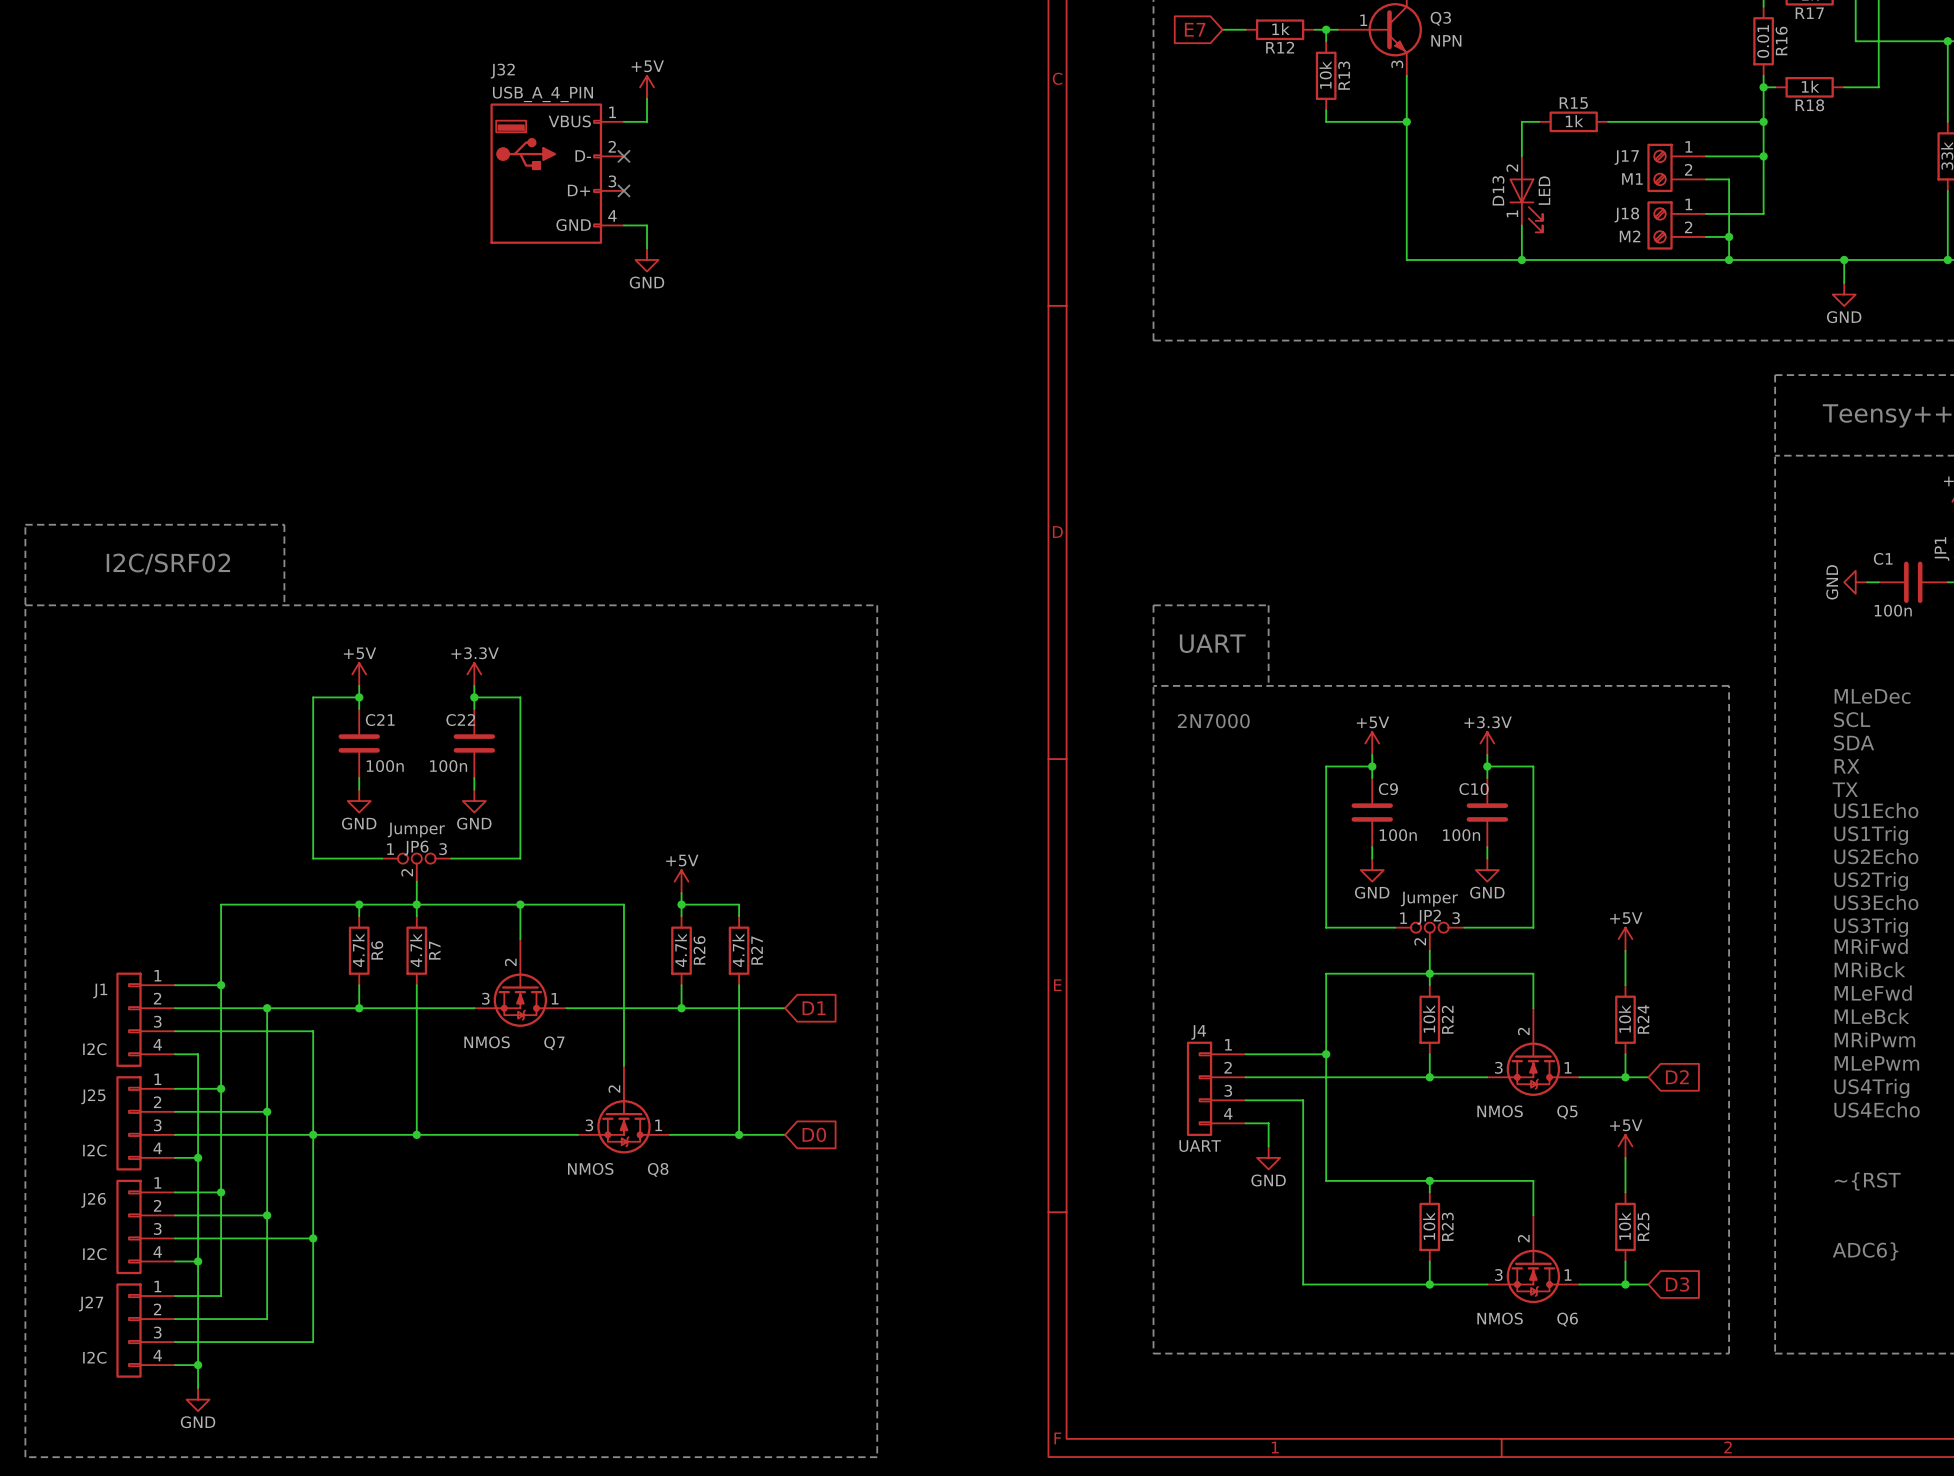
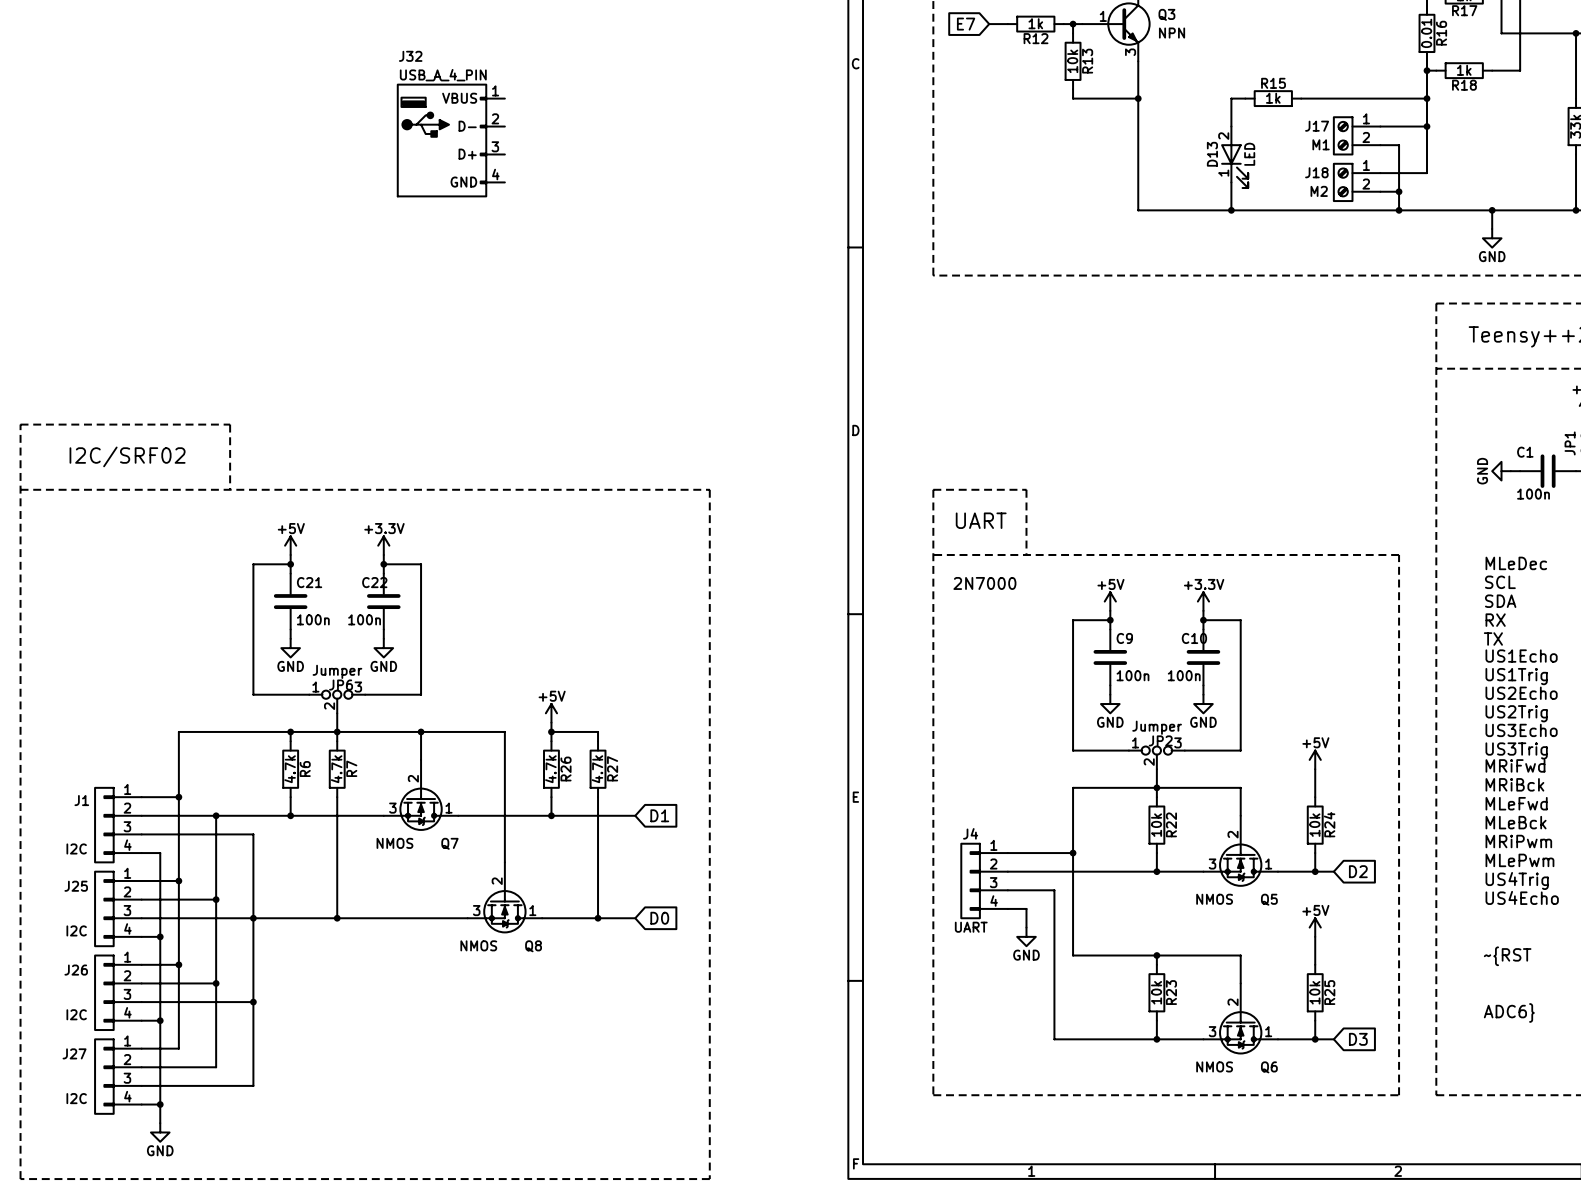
power symbol: +5V (647, 87) -> none
wire: (647, 98) (647, 121) (623, 121) -> none
no-connect mark: (623, 156) -> none
no-connect mark: (623, 190) -> none
wire: (623, 225) (647, 225) (647, 248) -> none
power symbol: GND (647, 259) -> none

